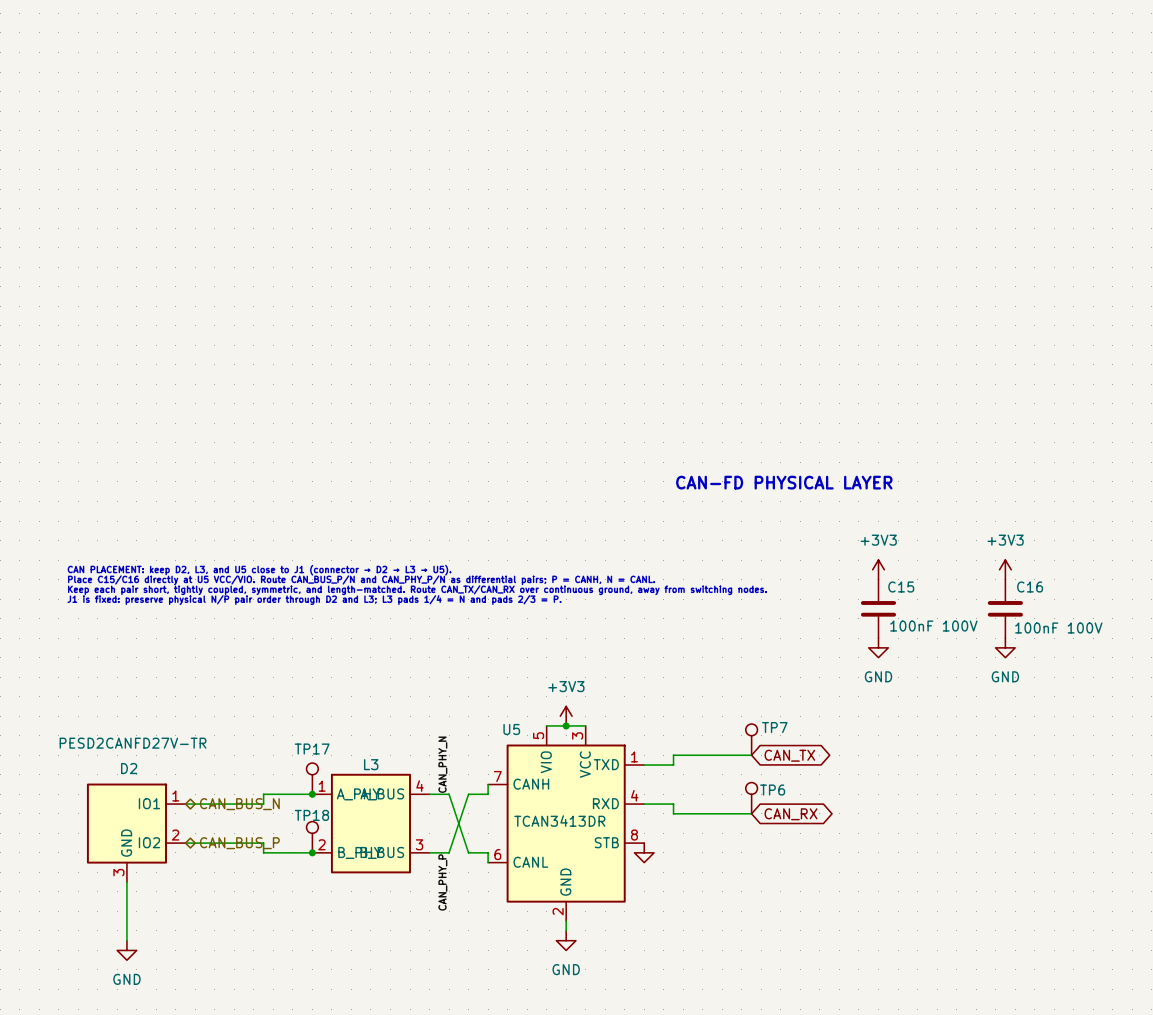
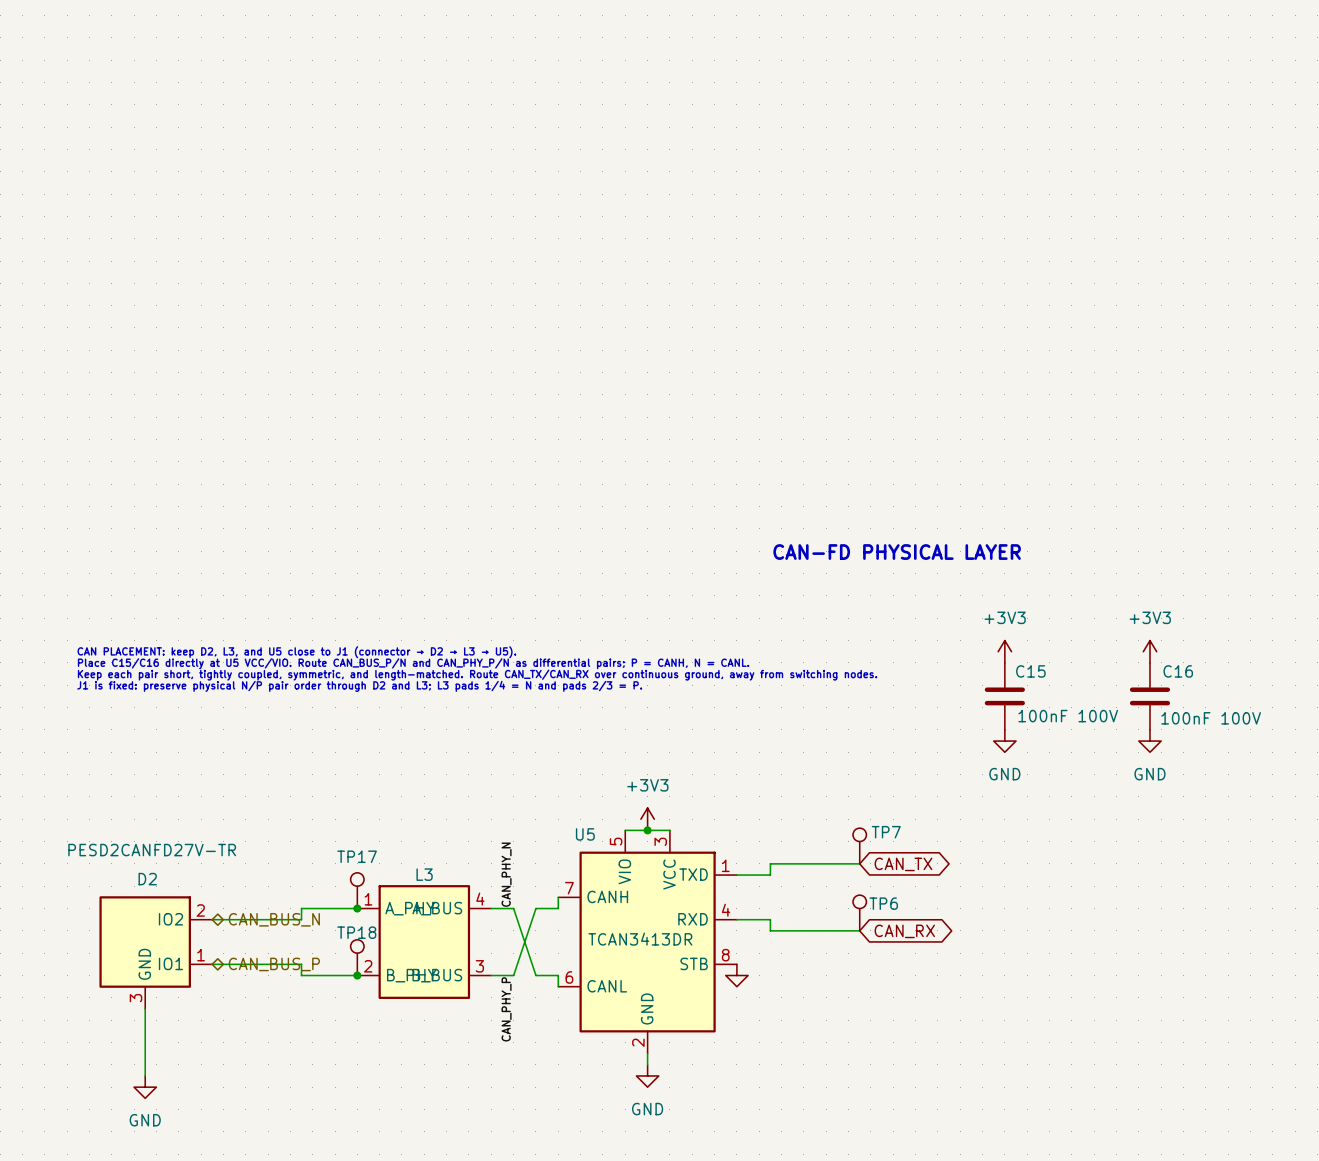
D2 pin number: 1 (175, 796) -> 2 (200, 910)
D2 pin name: IO1 (149, 803) -> IO2 (170, 919)
D2 pin number: 2 (175, 835) -> 1 (201, 955)
D2 pin name: IO2 (149, 842) -> IO1 (170, 963)

